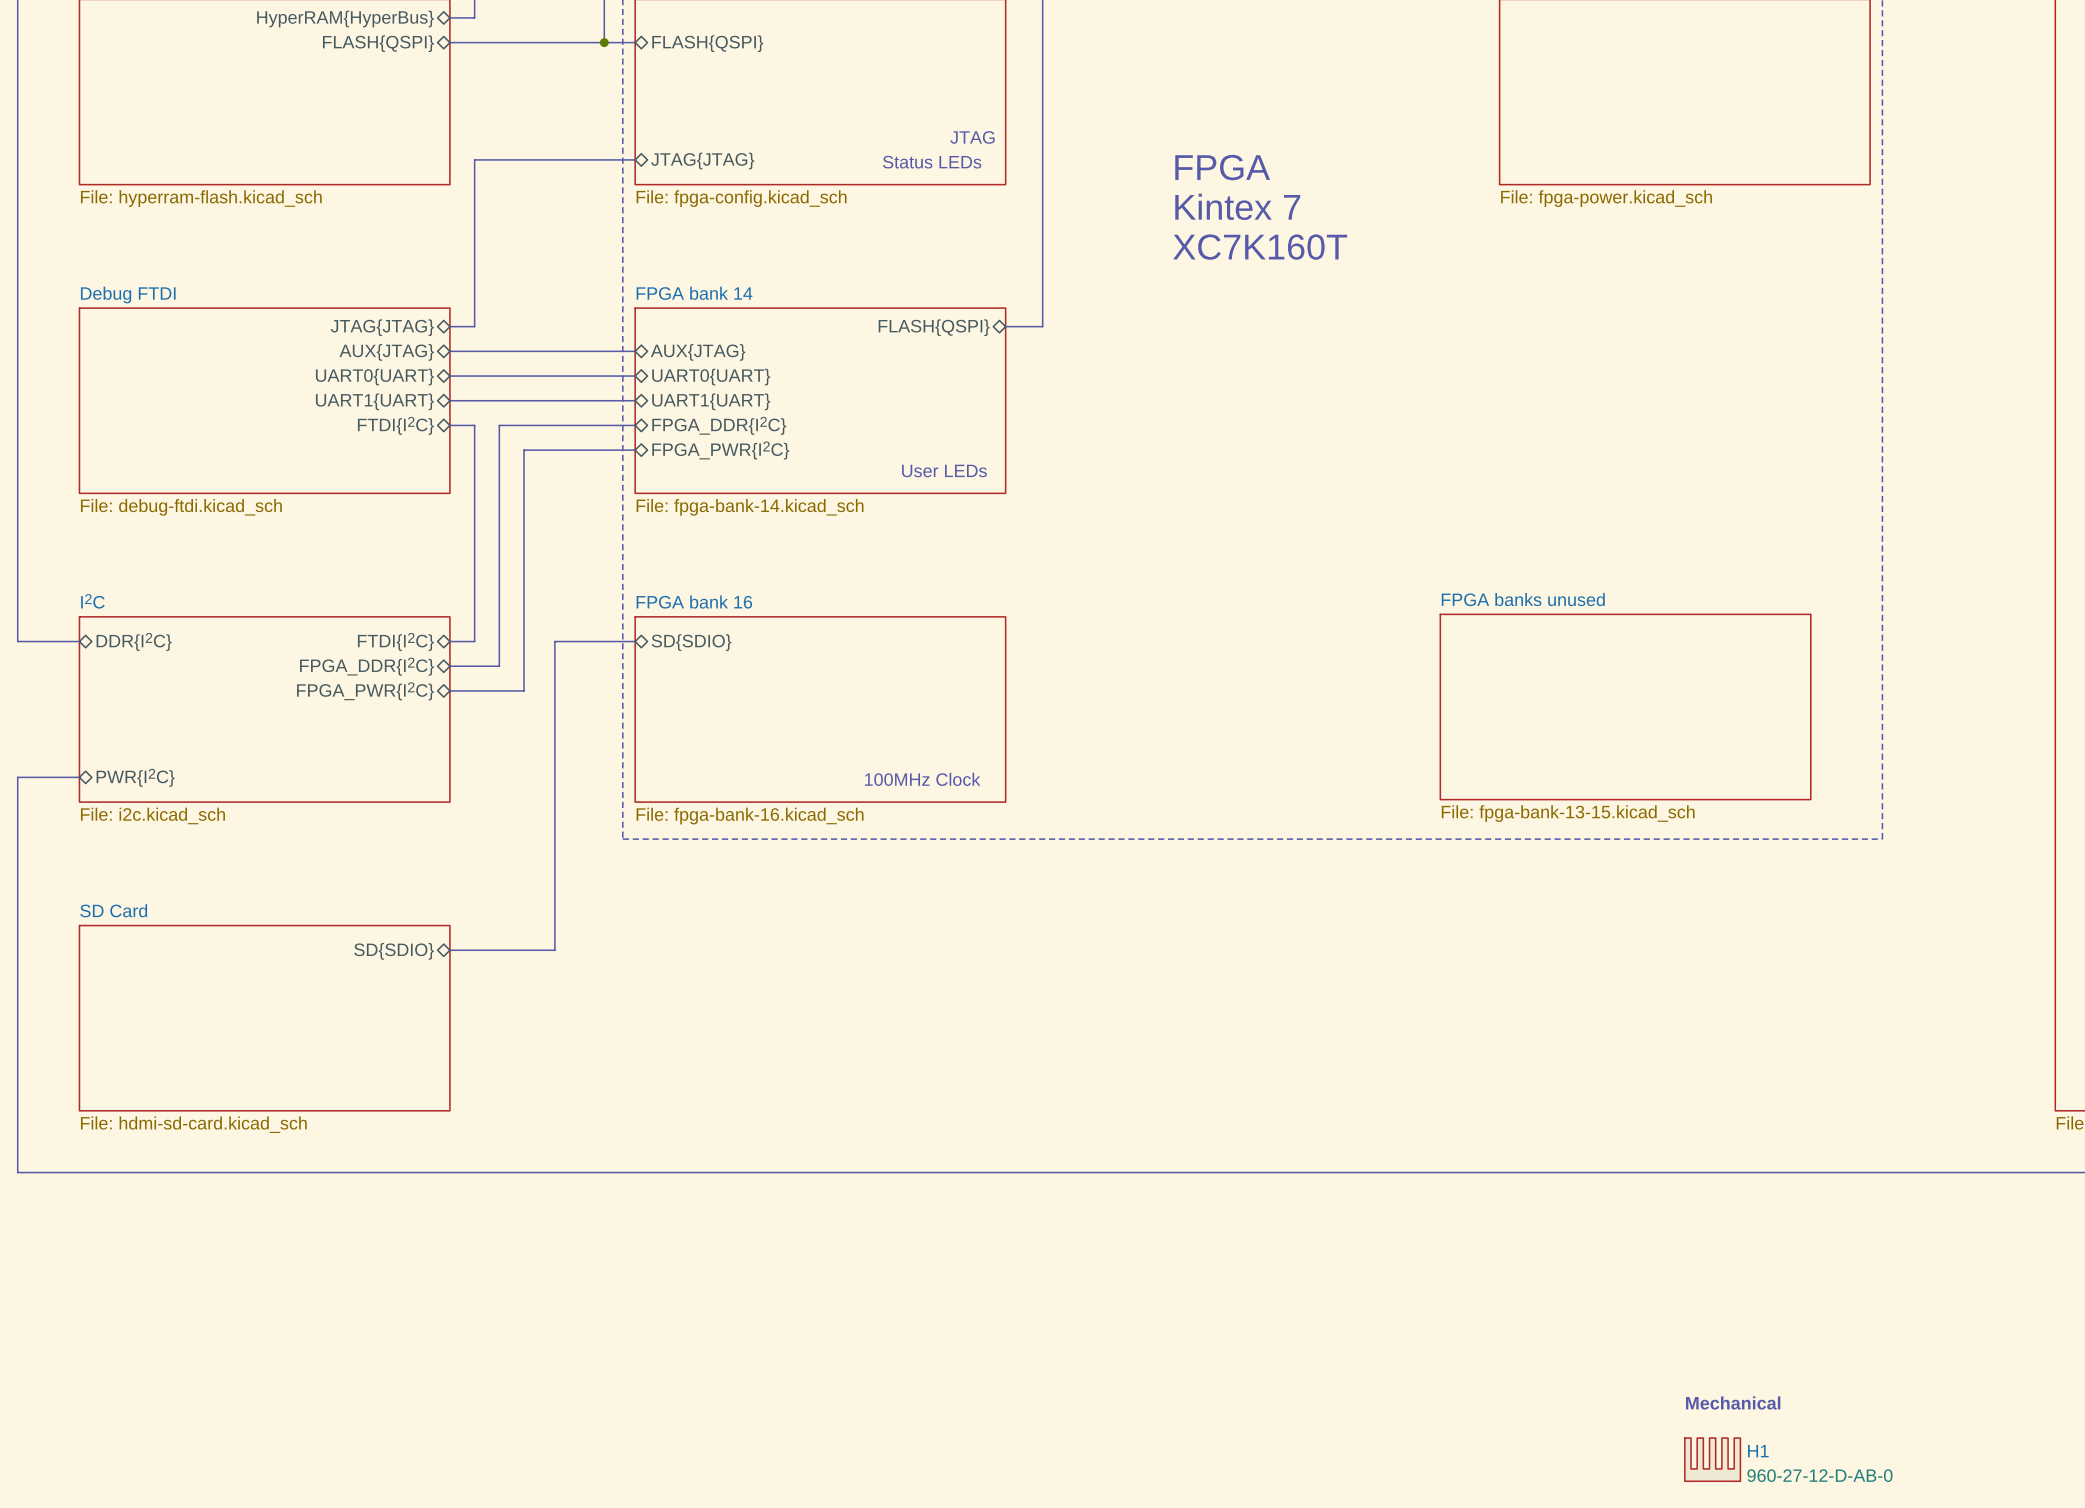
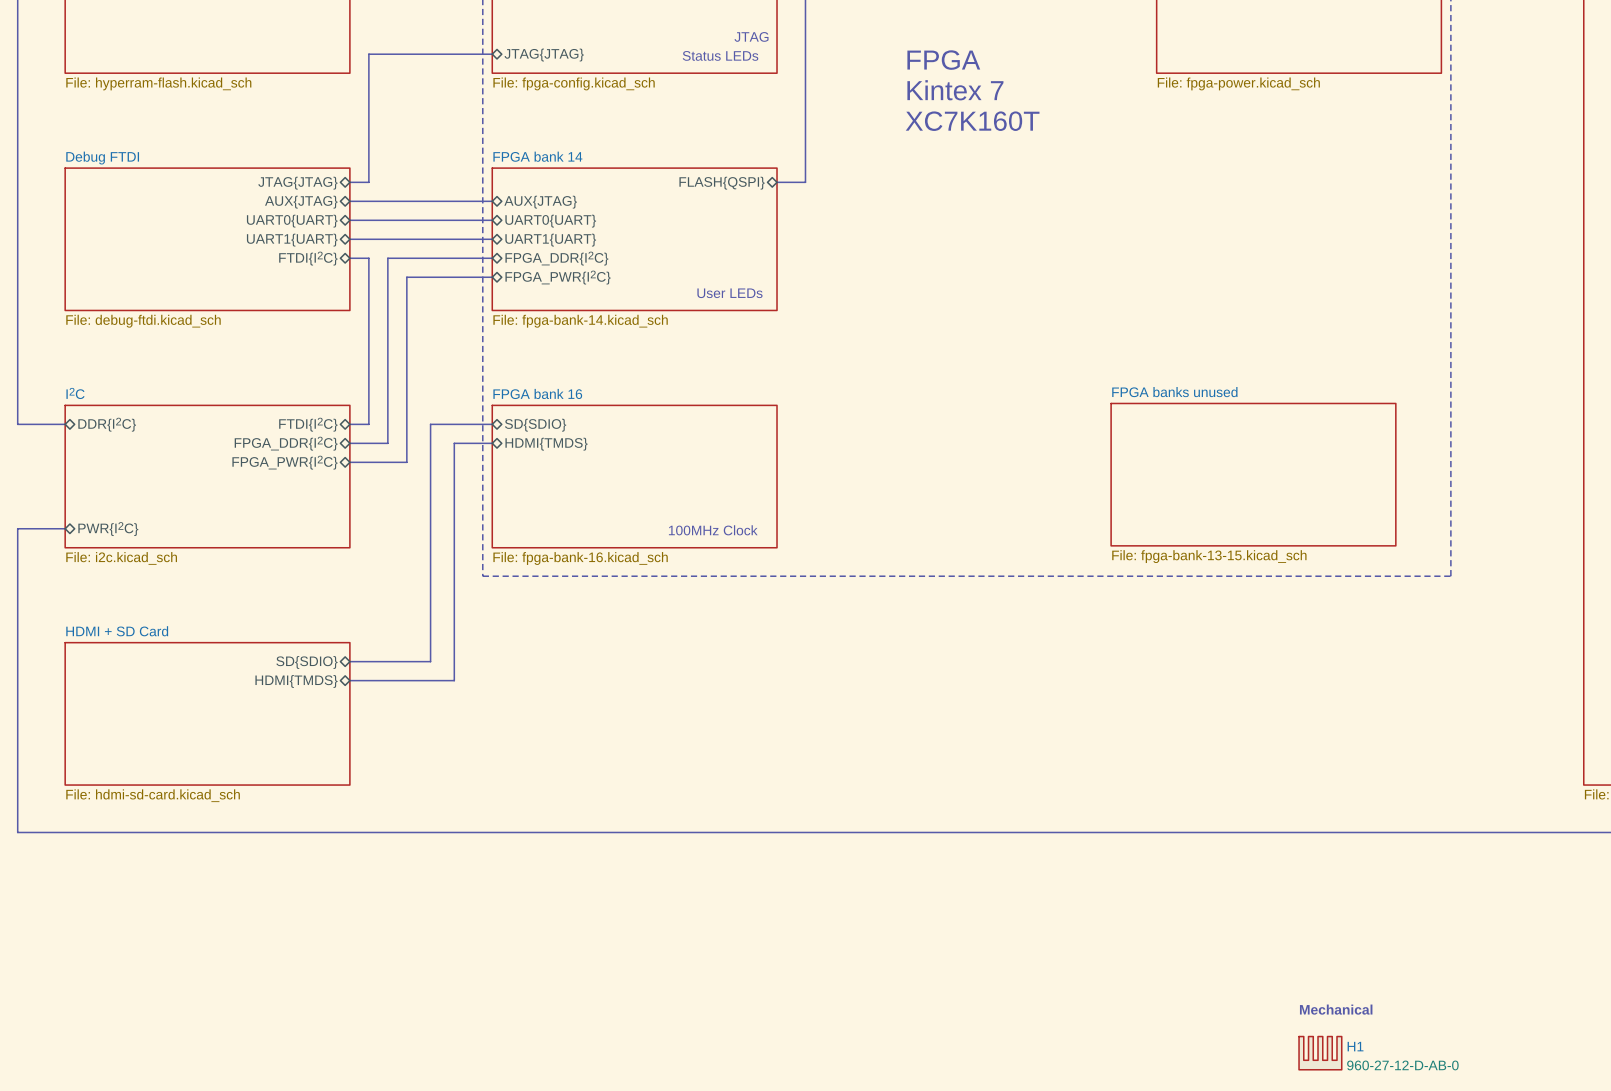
bus: none -> (492, 443) (454, 443) (454, 680) (349, 680)
sheet pin: none -> HDMI{TMDS} (546, 444)
sheet SD Card name: SD Card (113, 910) -> HDMI + SD Card (117, 631)
sheet pin: none -> HDMI{TMDS} (296, 681)

